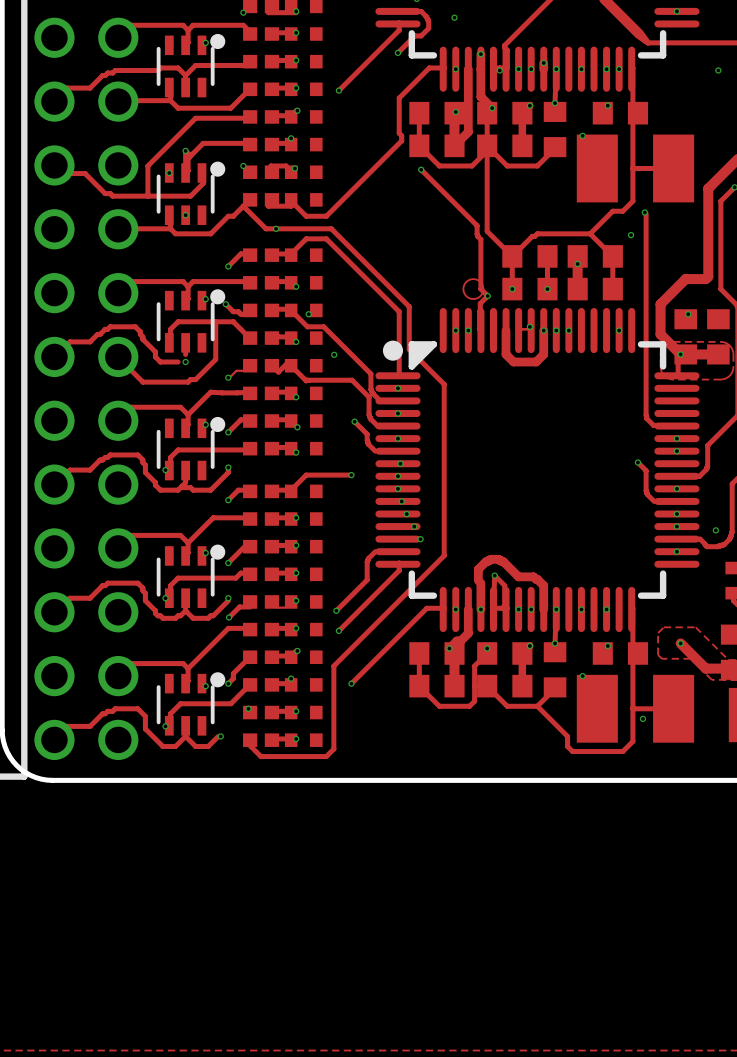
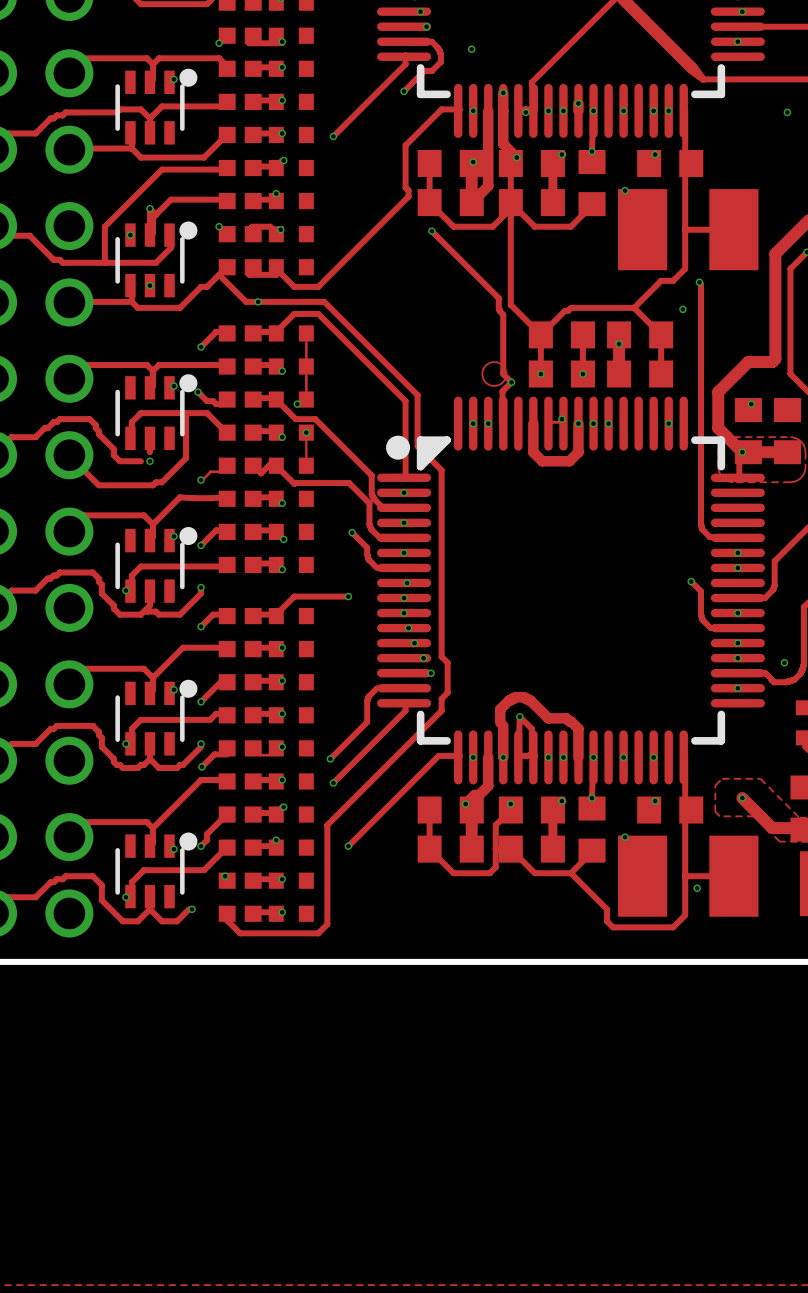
track: none -> (306, 333) (306, 398)
track: none -> (306, 432) (306, 465)
via position: (334, 354) -> (306, 432)
track: (429, 369) (444, 384) (444, 555) (429, 570) -> (441, 470) (441, 656) (447, 662) (447, 692) (441, 698) (441, 710)

